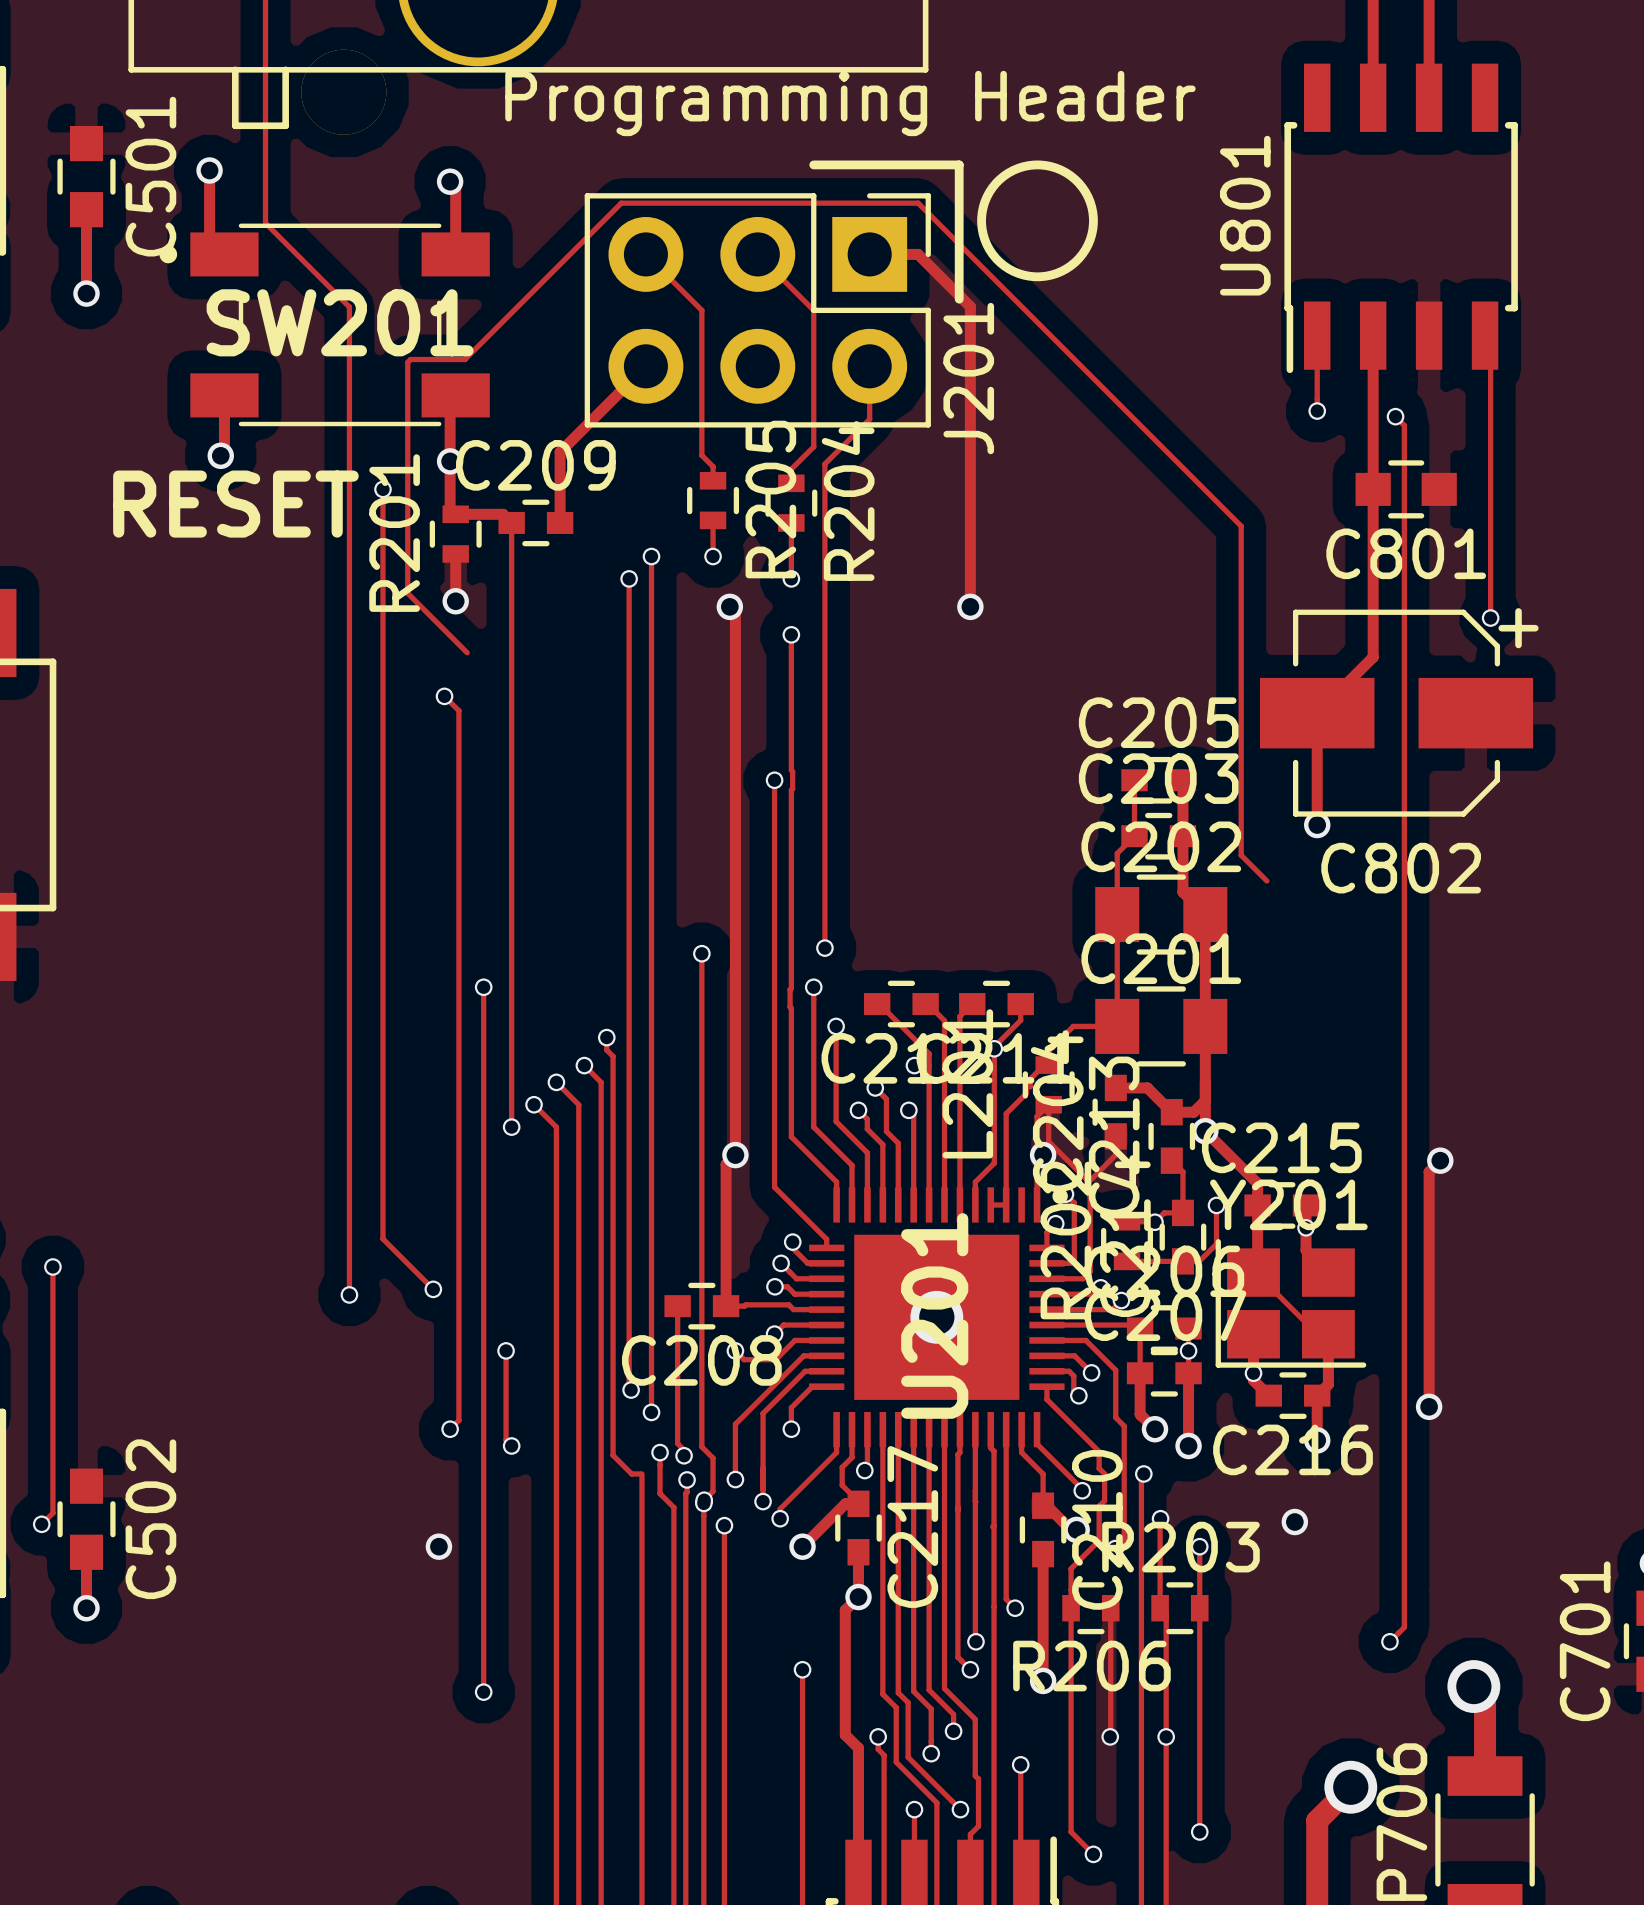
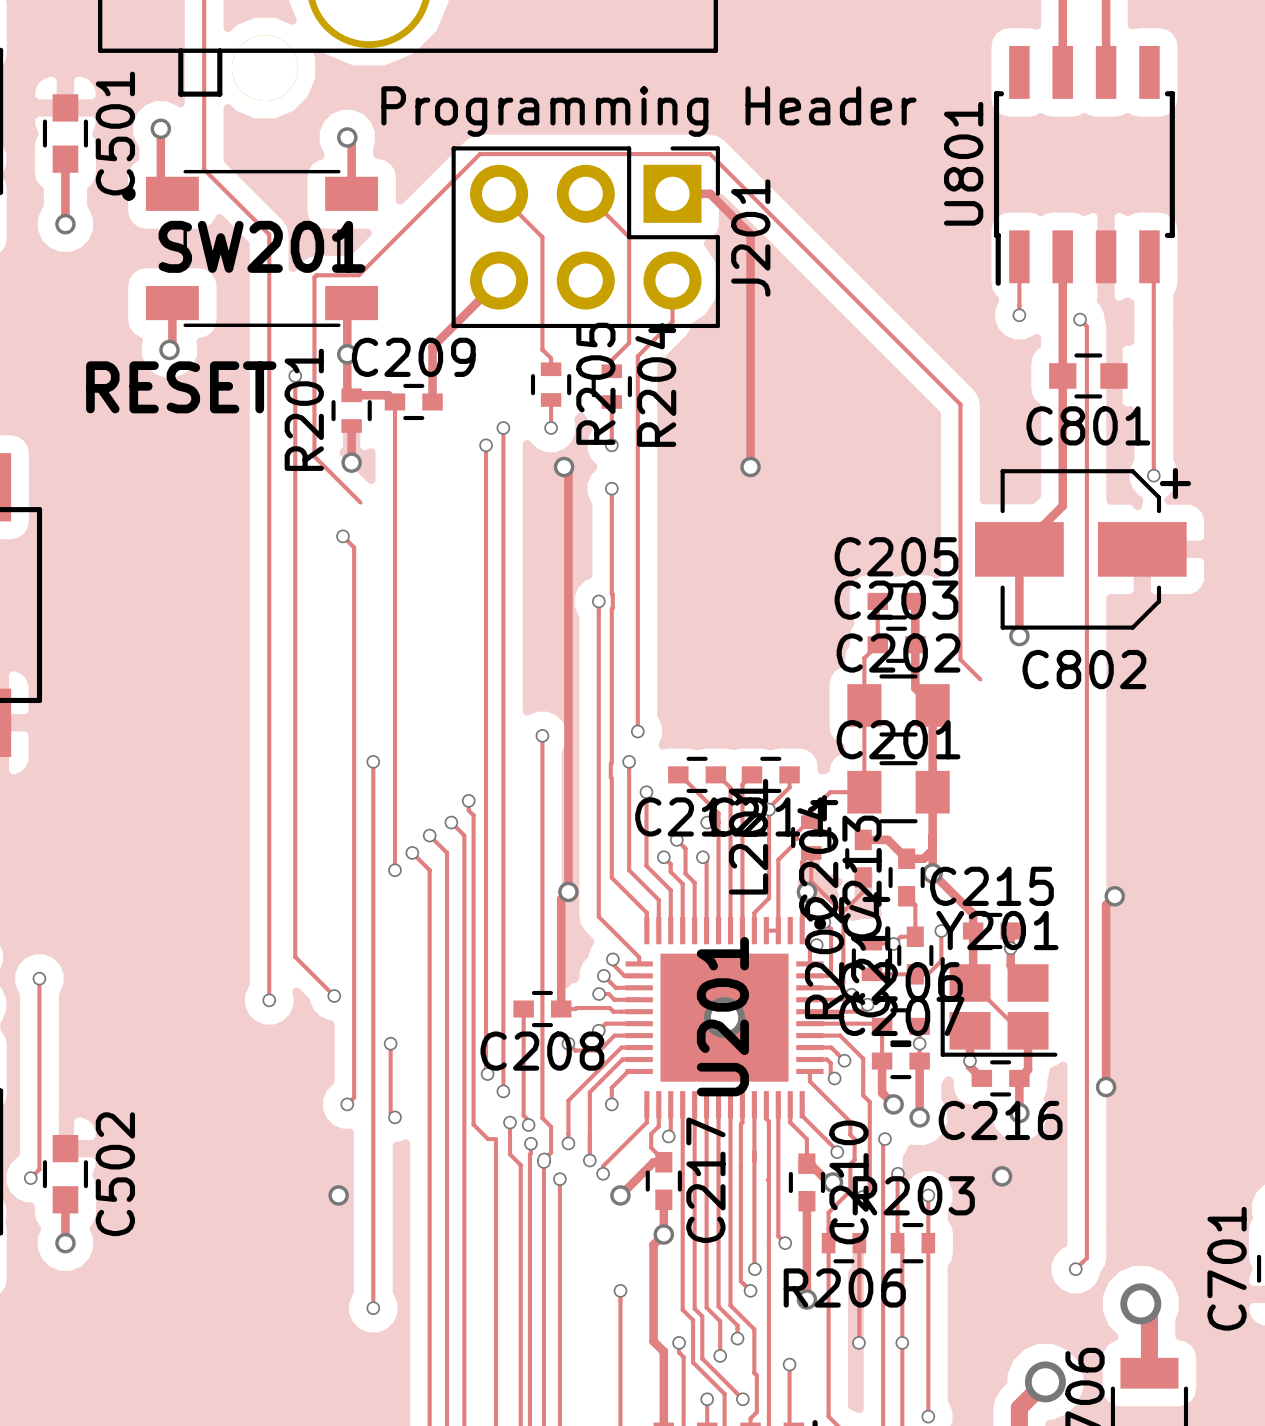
J201 value position: Programming Header (850, 103) -> Programming Header (648, 111)
drawing: [977, 160, 1098, 282] -> none
line: (813, 164) (959, 164) (959, 299) -> none
J201 name position: J201 (968, 378) -> J201 (750, 238)

